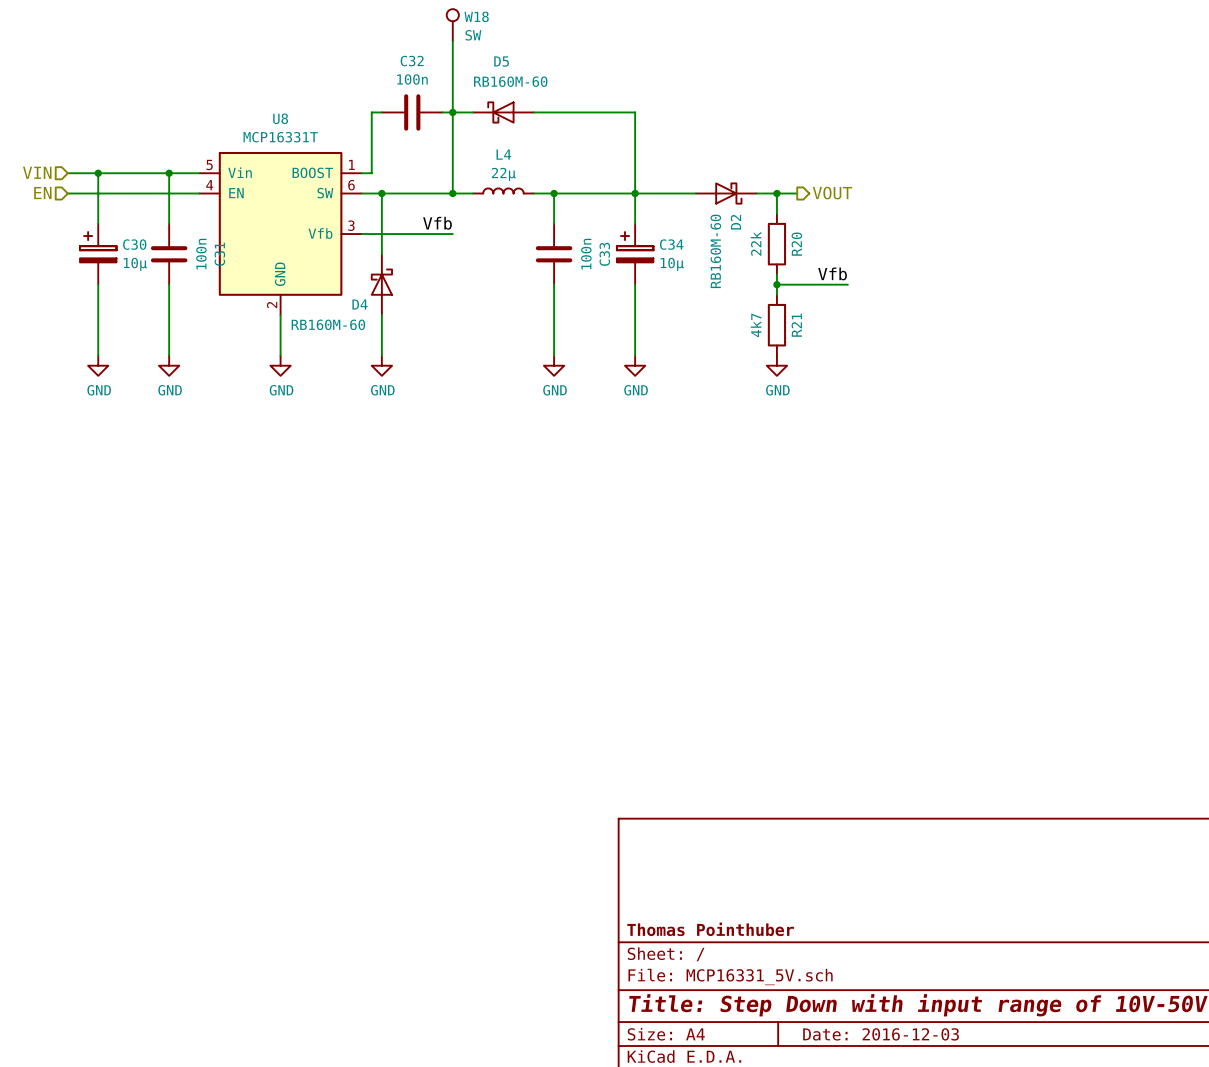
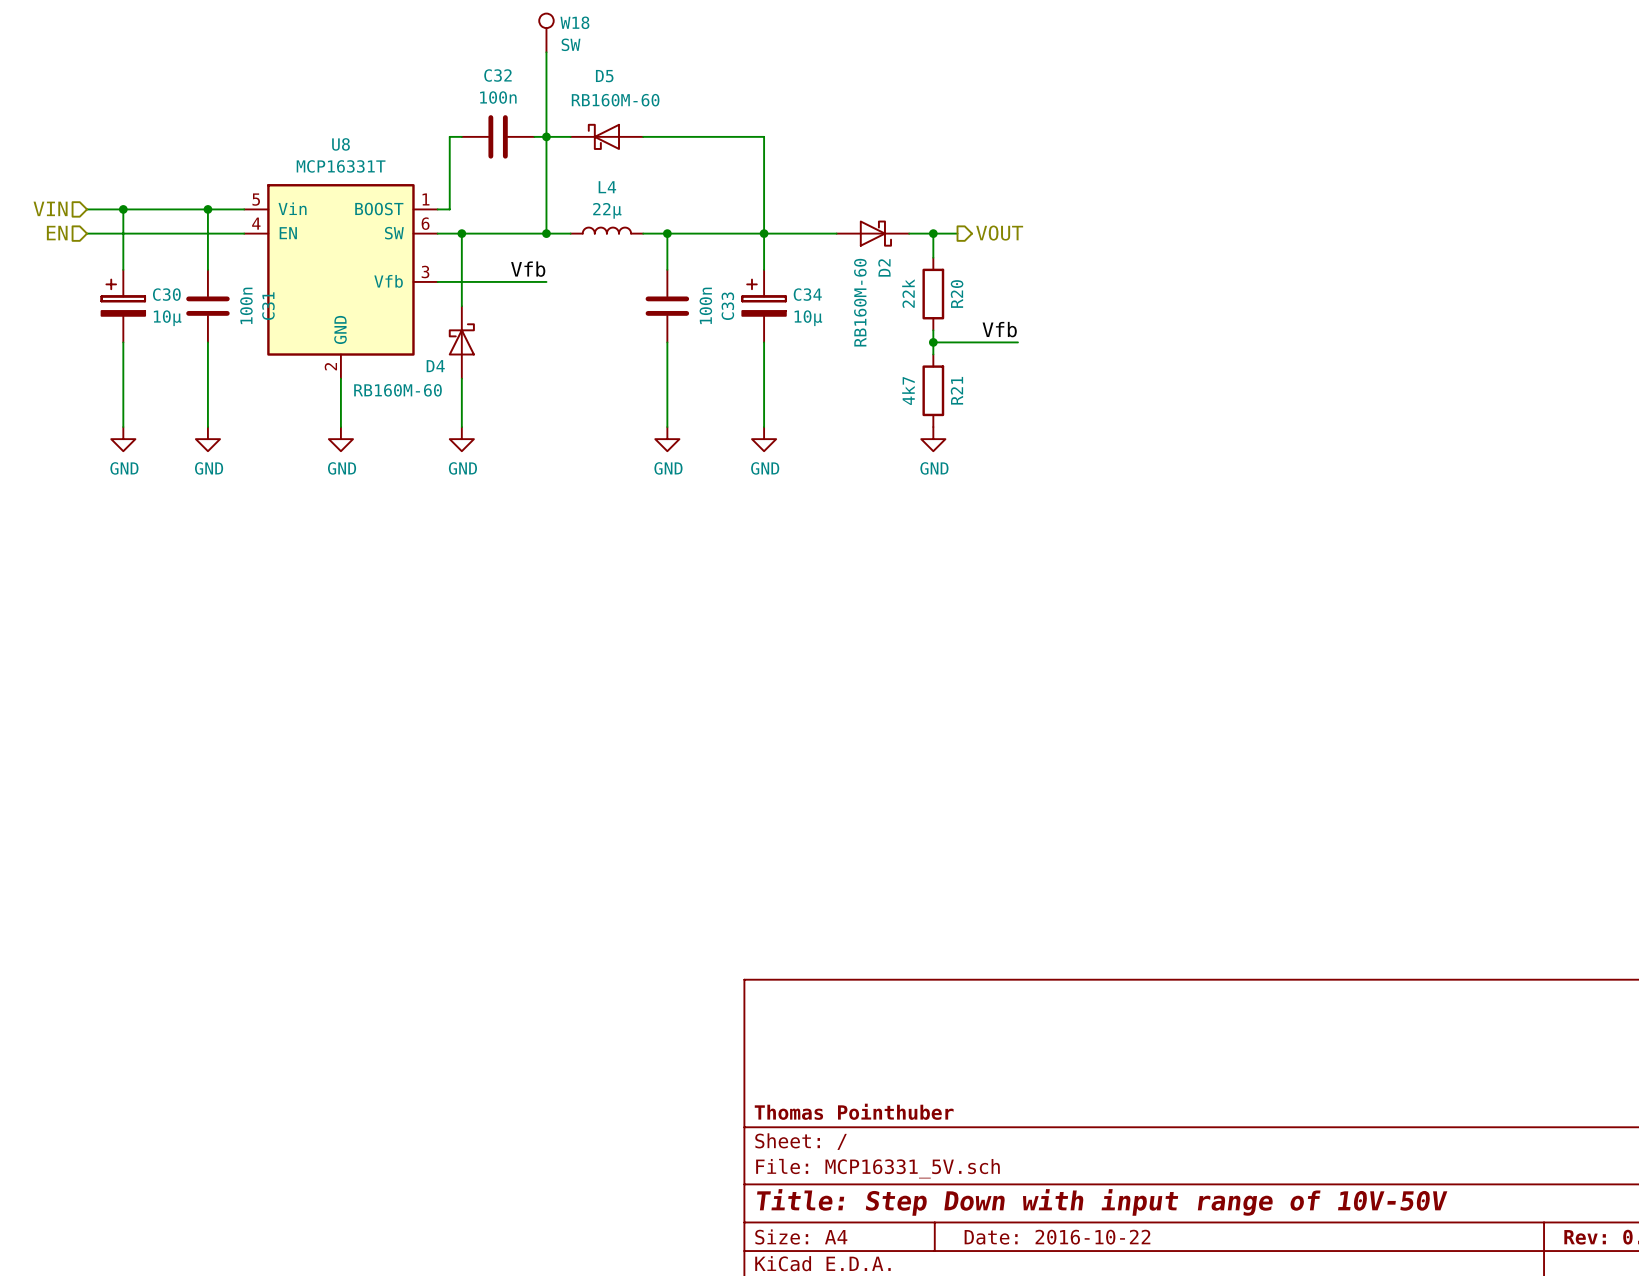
title block: Date: 2016-12-03 (881, 1034) -> Date: 2016-10-22 (1057, 1237)

